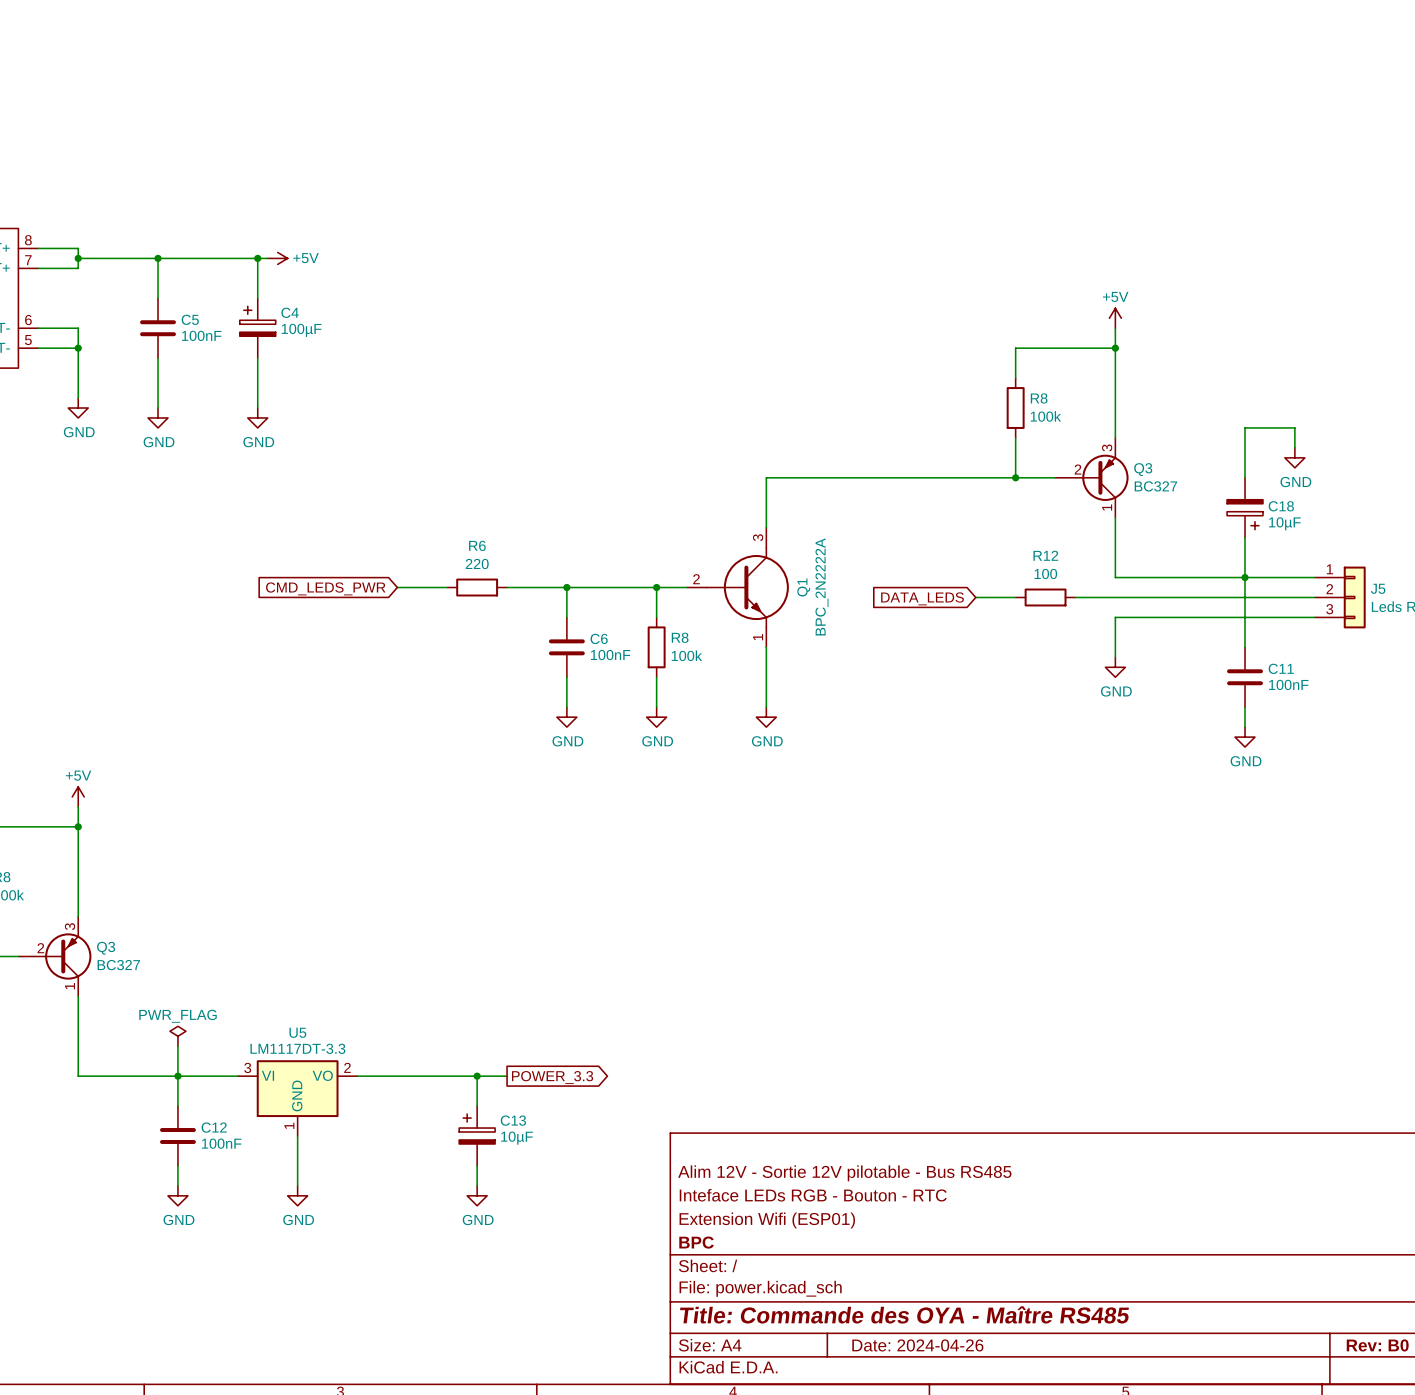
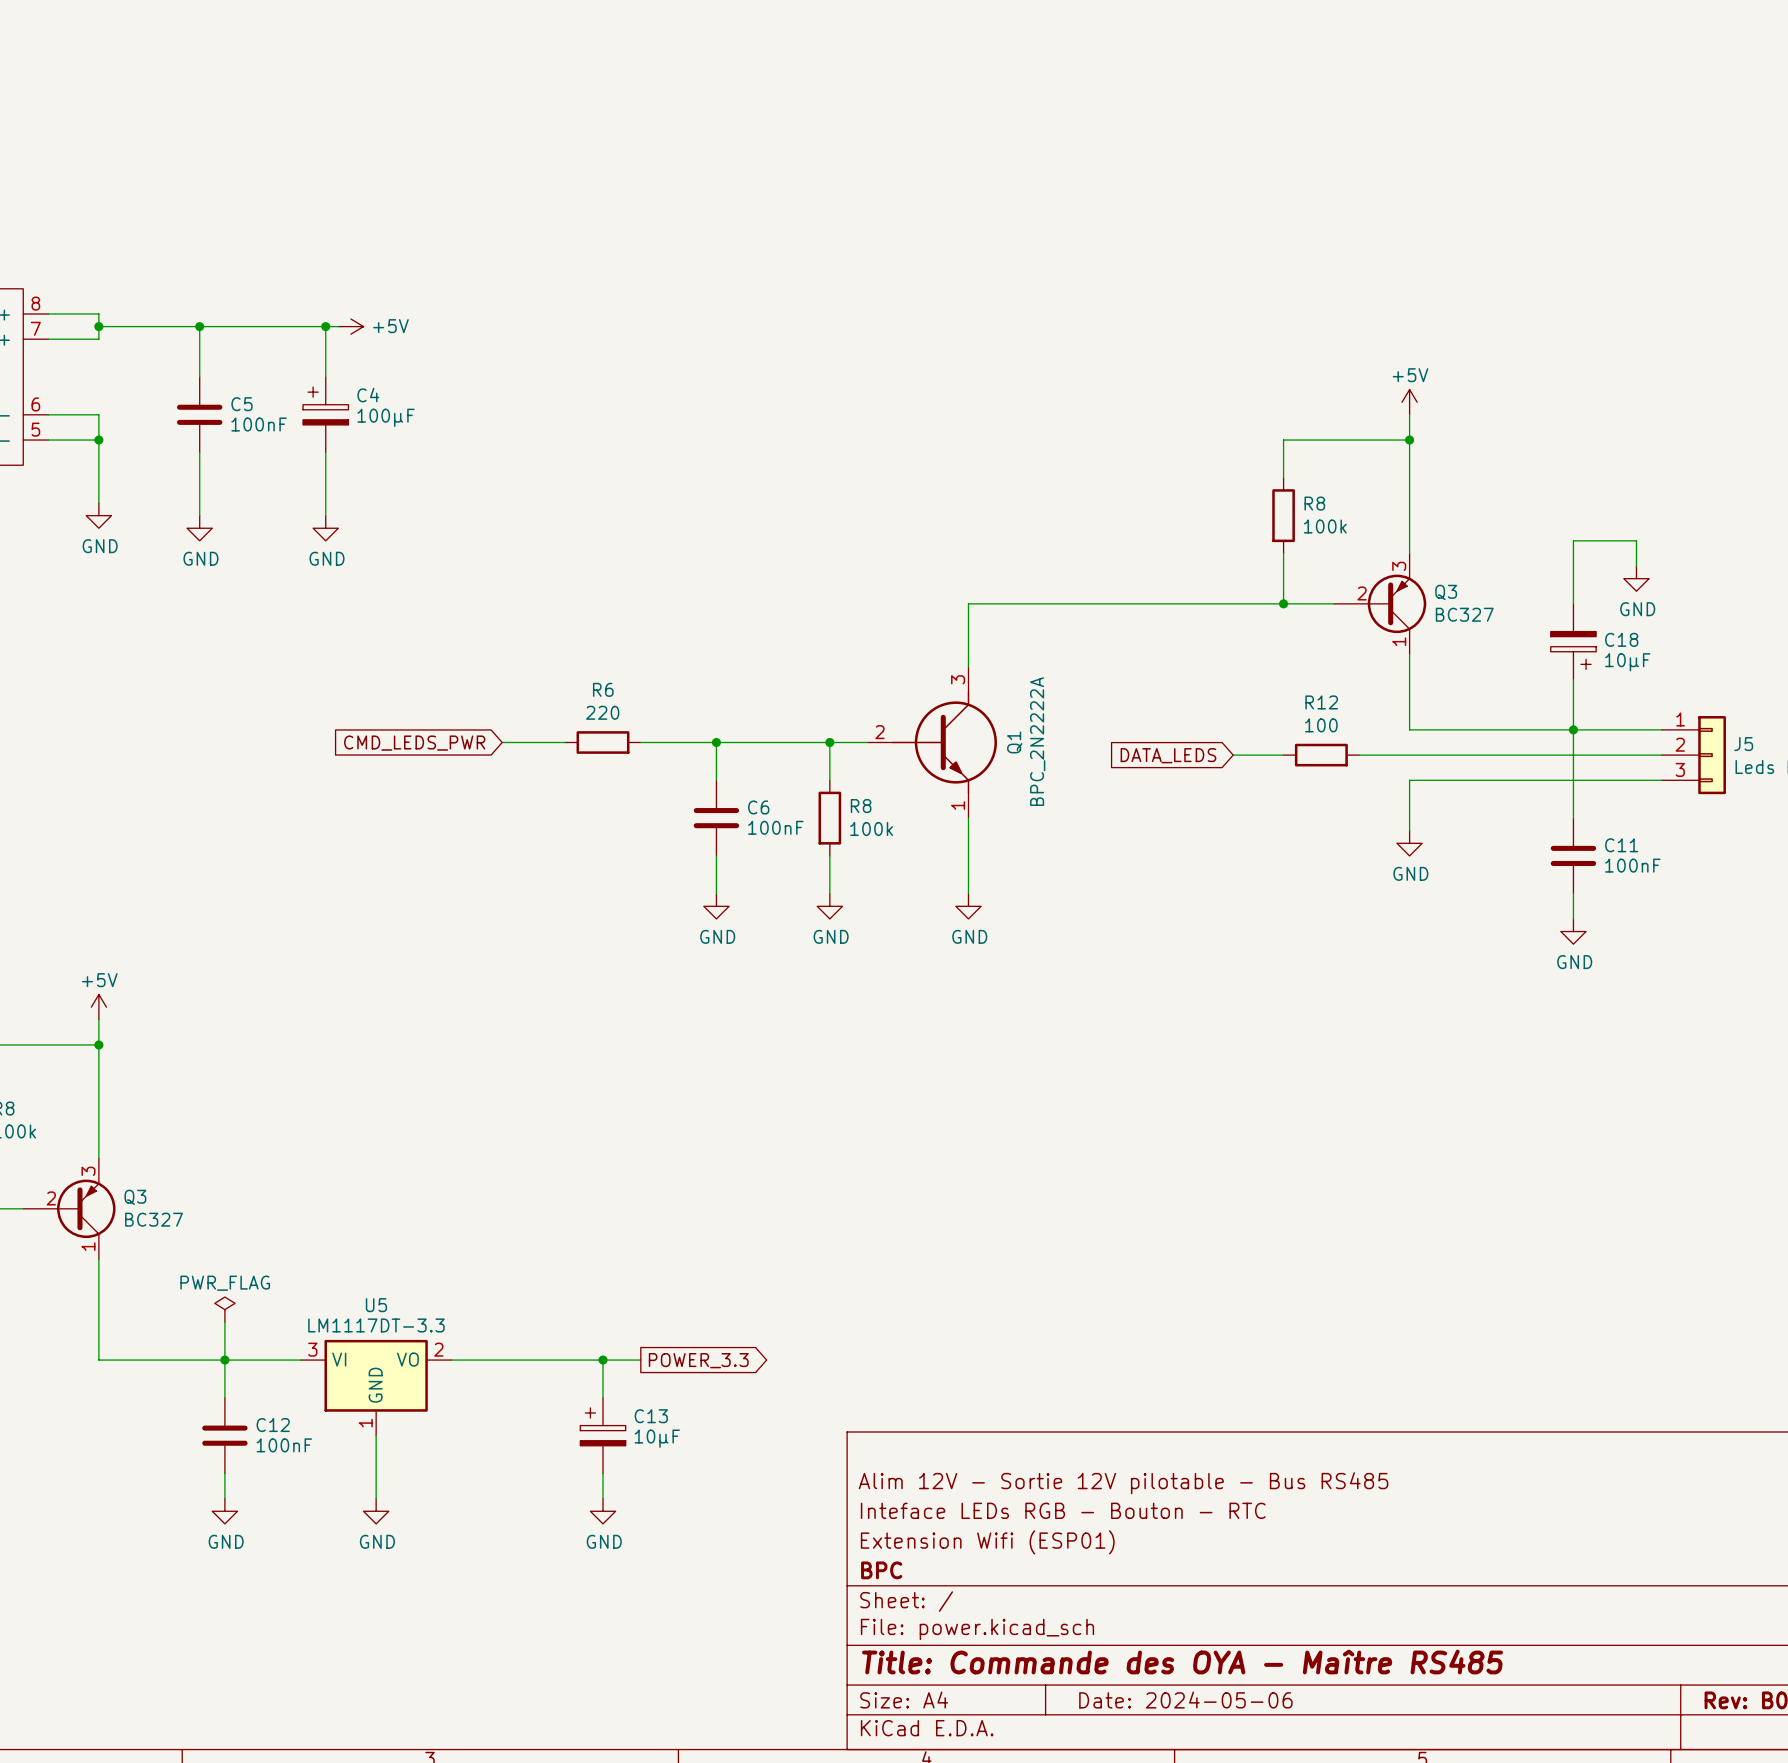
title block: Date: 2024-04-26 (917, 1345) -> Date: 2024-05-06 (1185, 1700)

